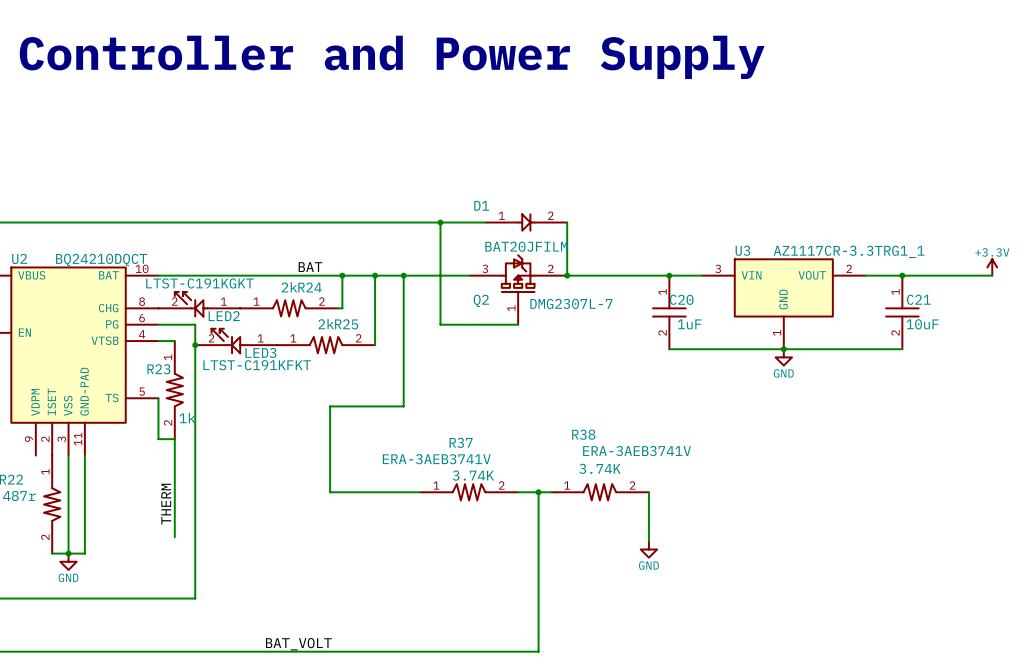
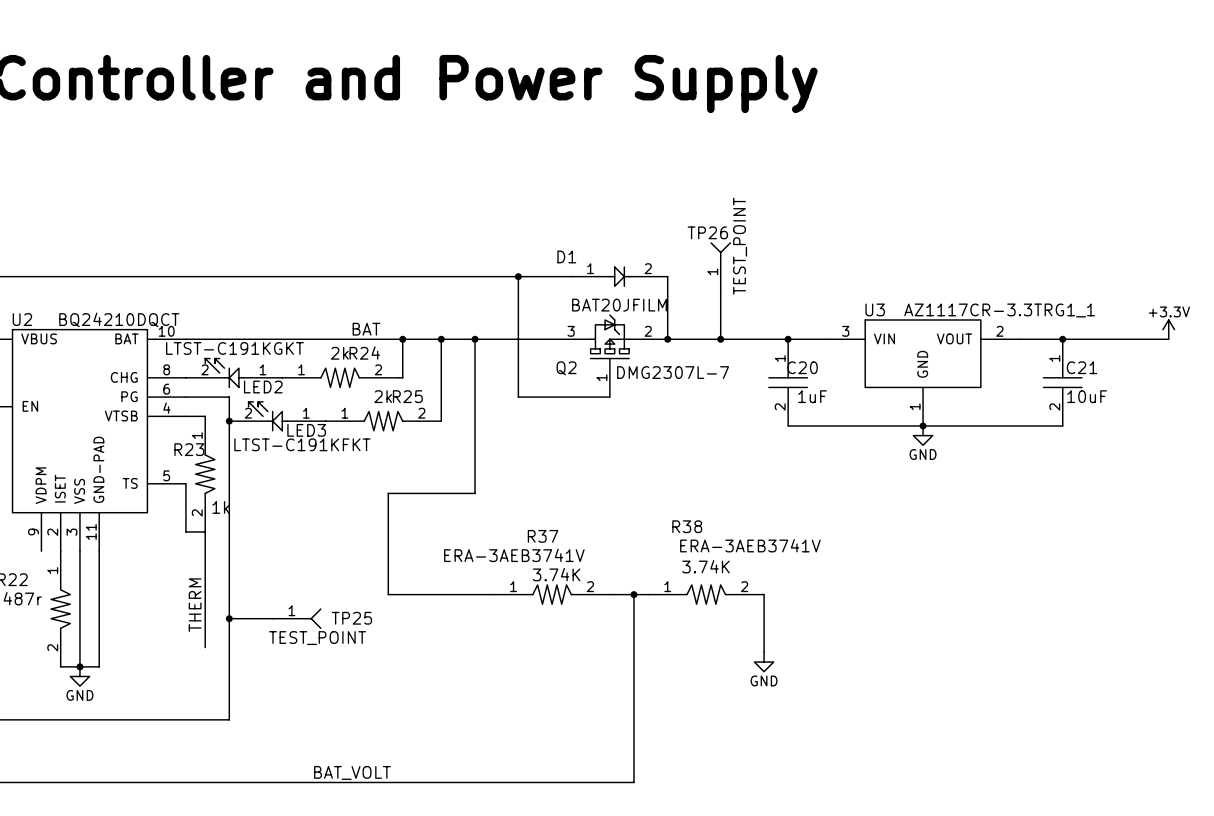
TP26: none -> TEST_POINT (720, 267)
wire: none -> (720, 291) (720, 339)
junction: none -> (720, 339)
wire: none -> (229, 618) (272, 618)
junction: none -> (229, 618)
TP25: none -> TEST_POINT (296, 618)

